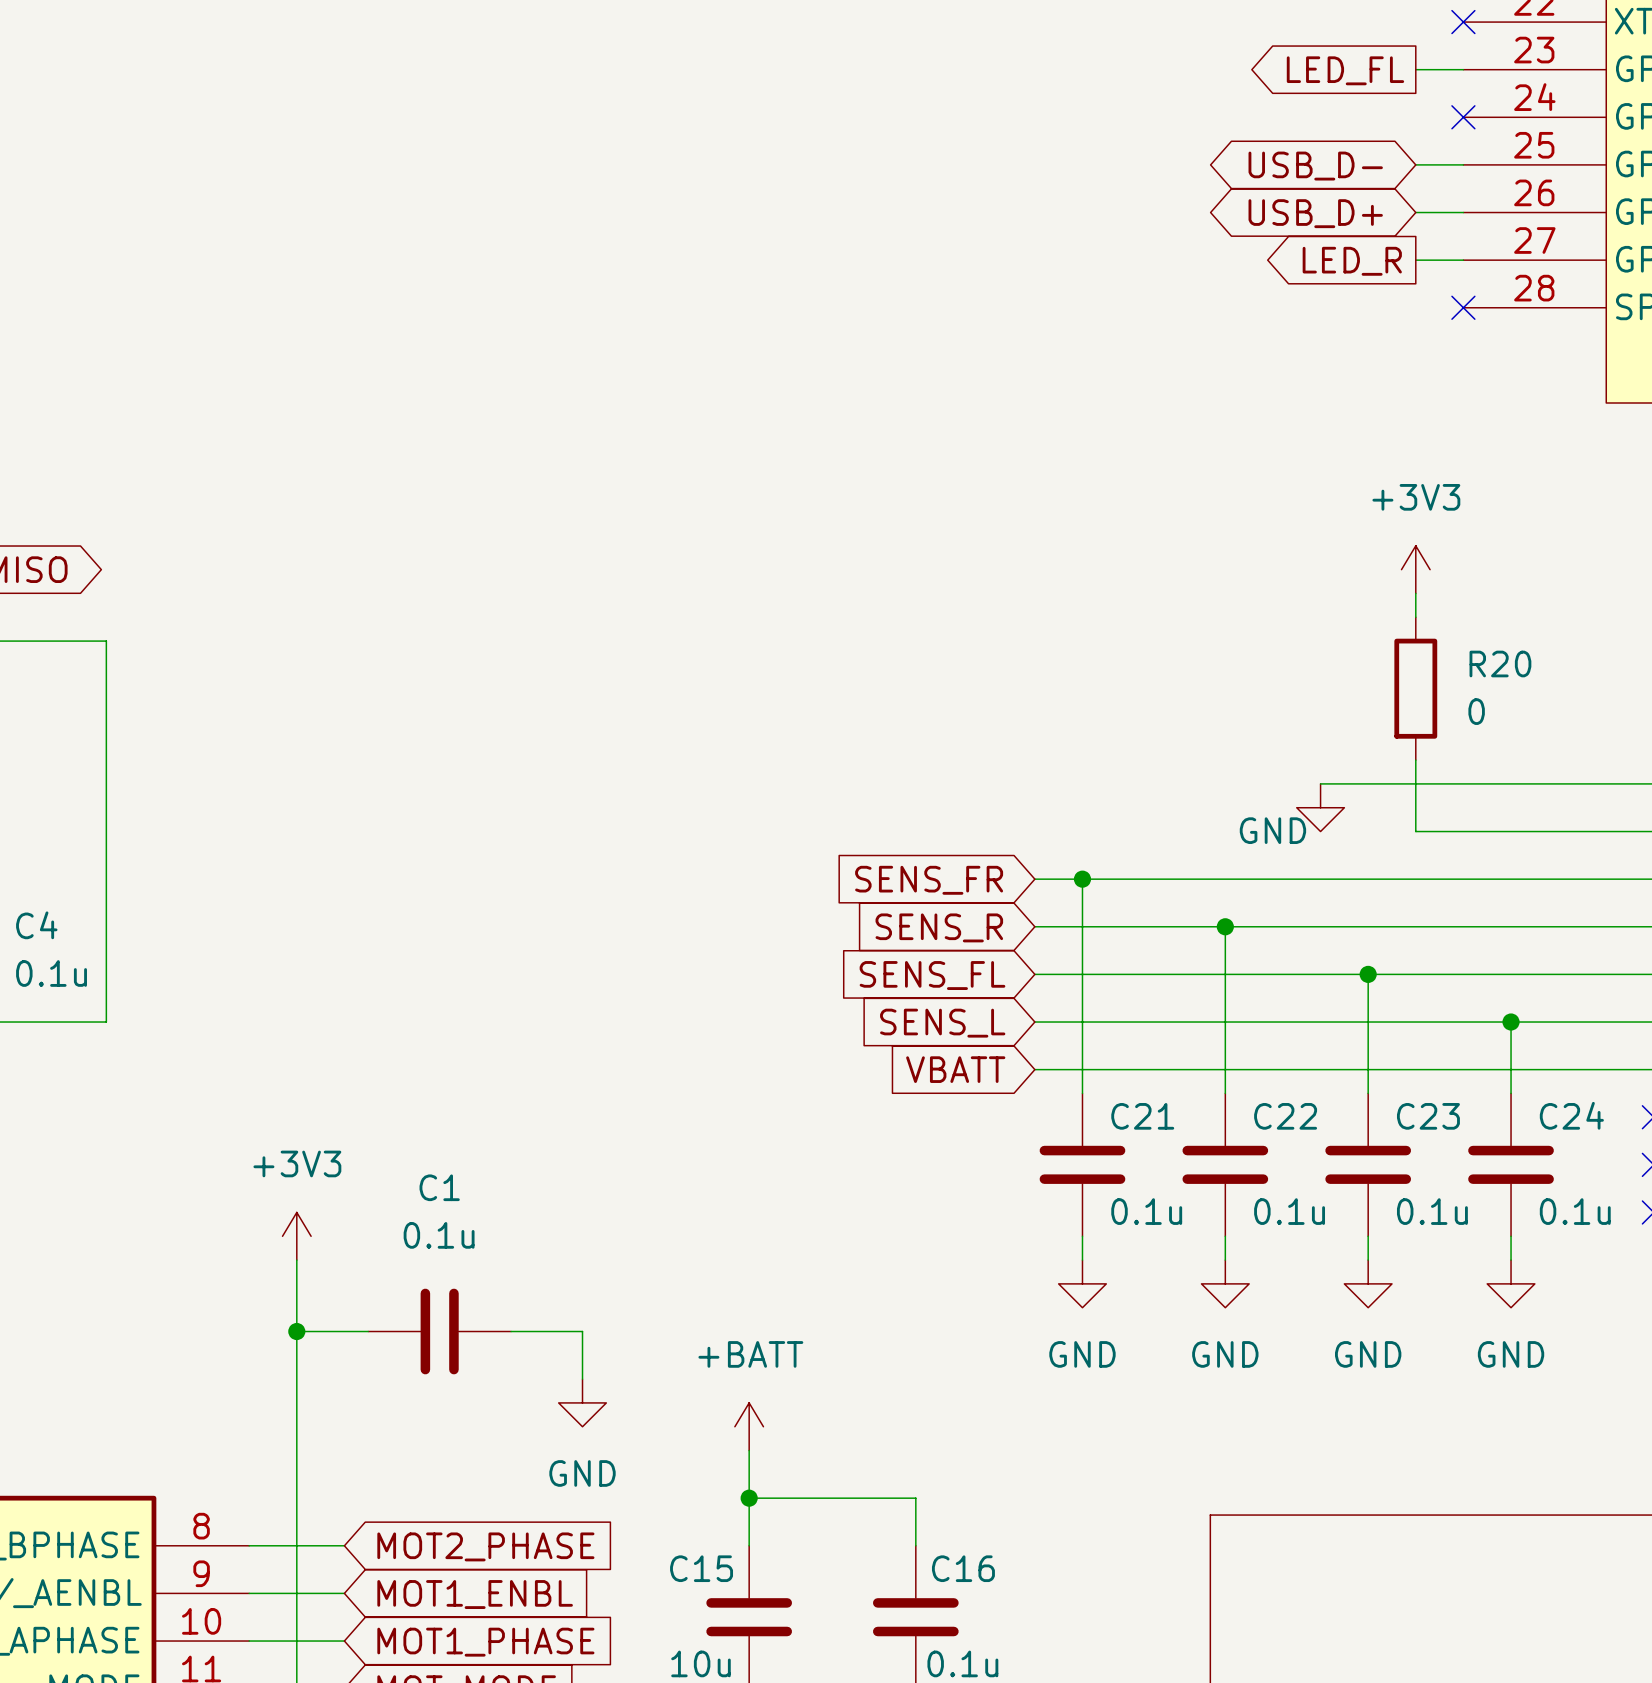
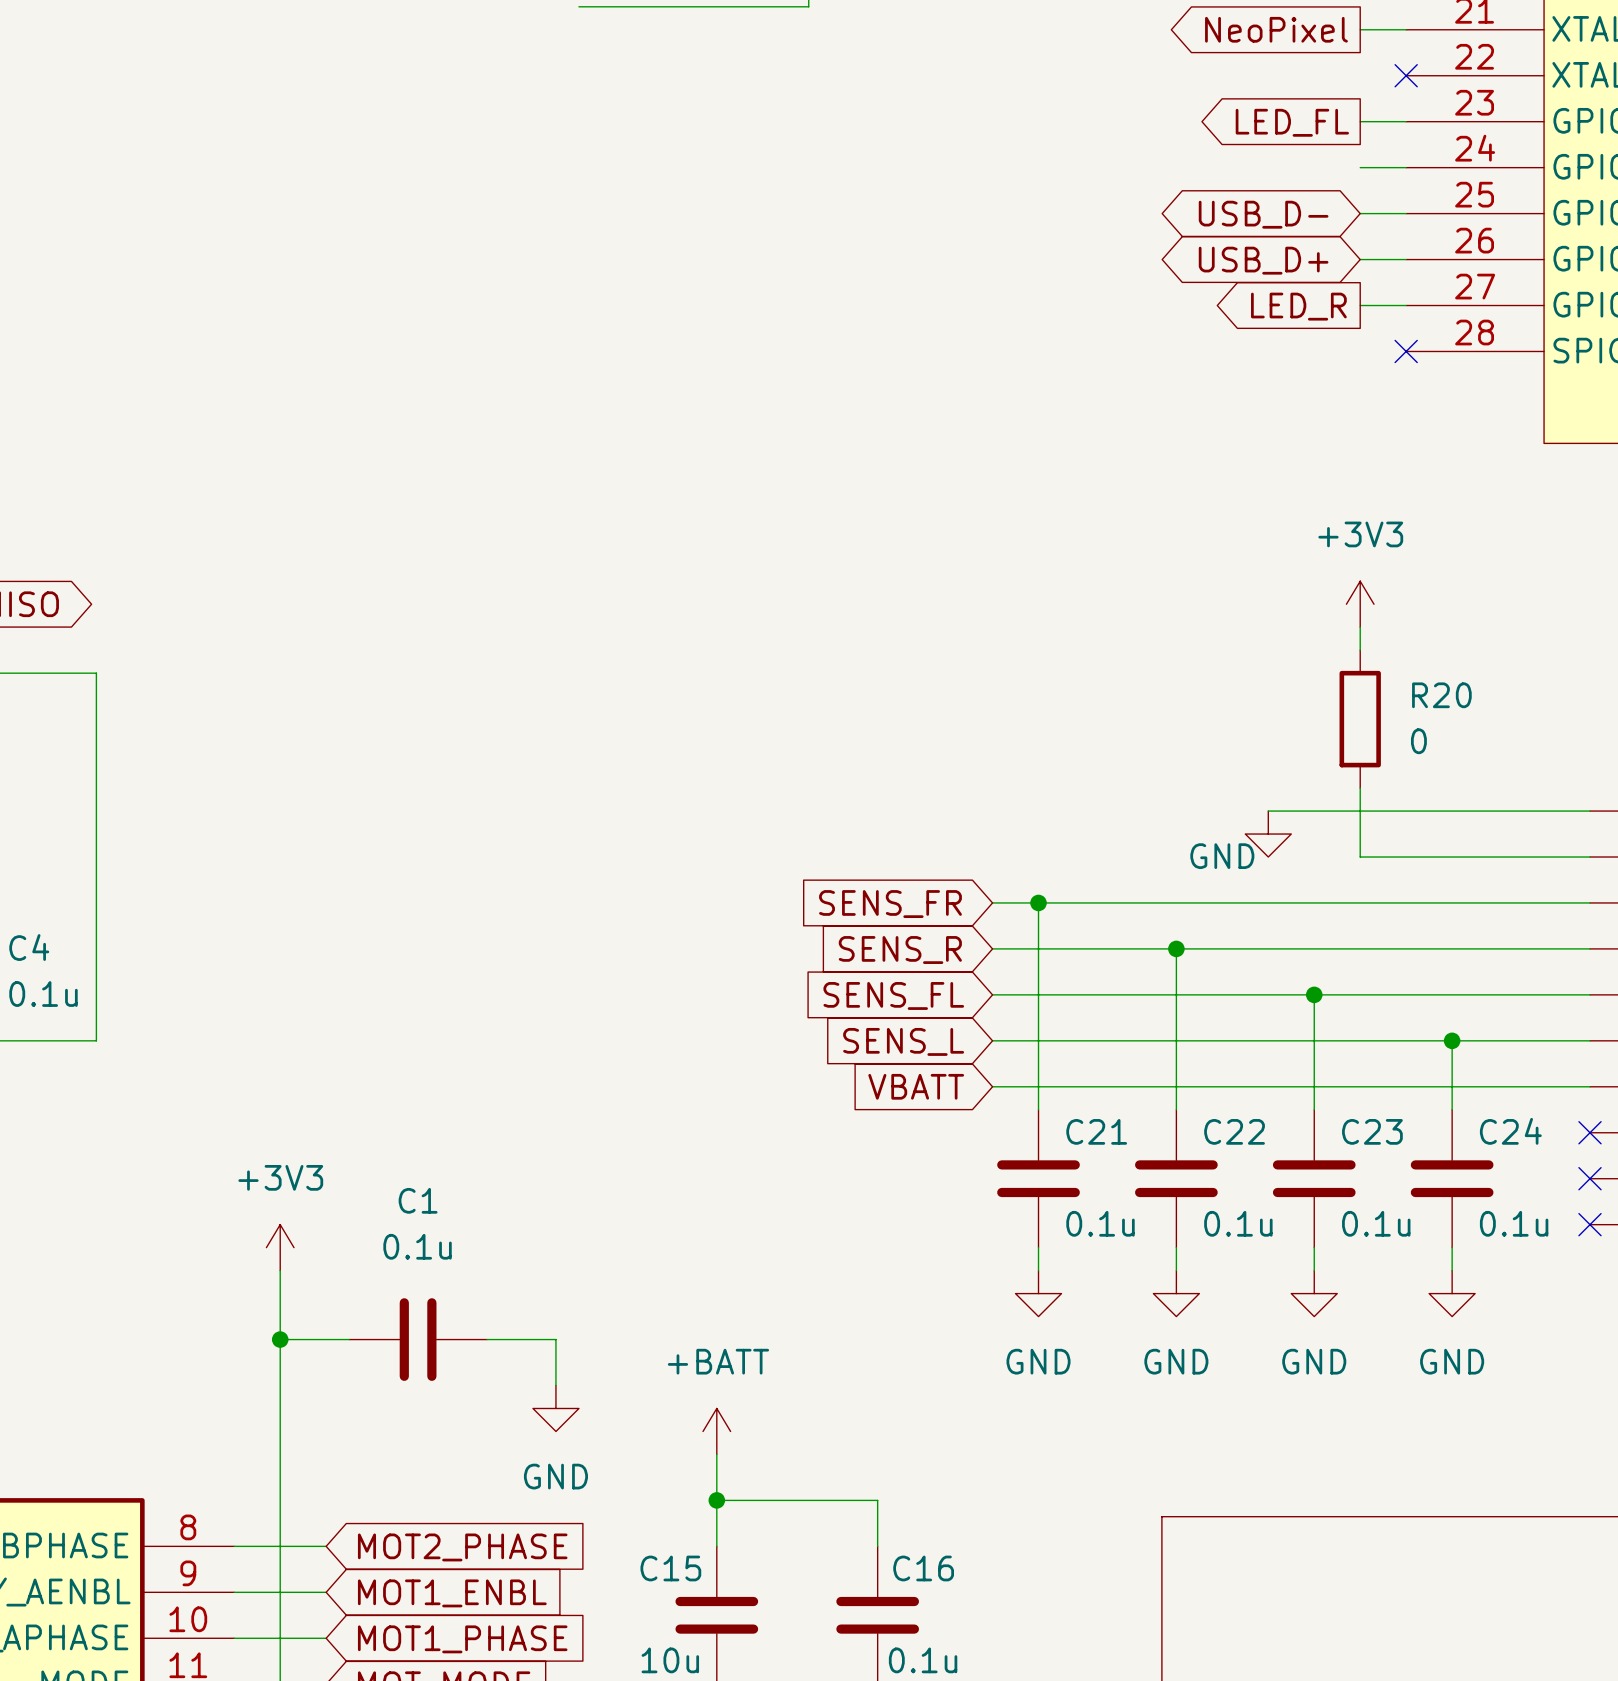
wire: none -> (1360, 167) (1406, 167)
no-connect mark: (1463, 117) -> none

